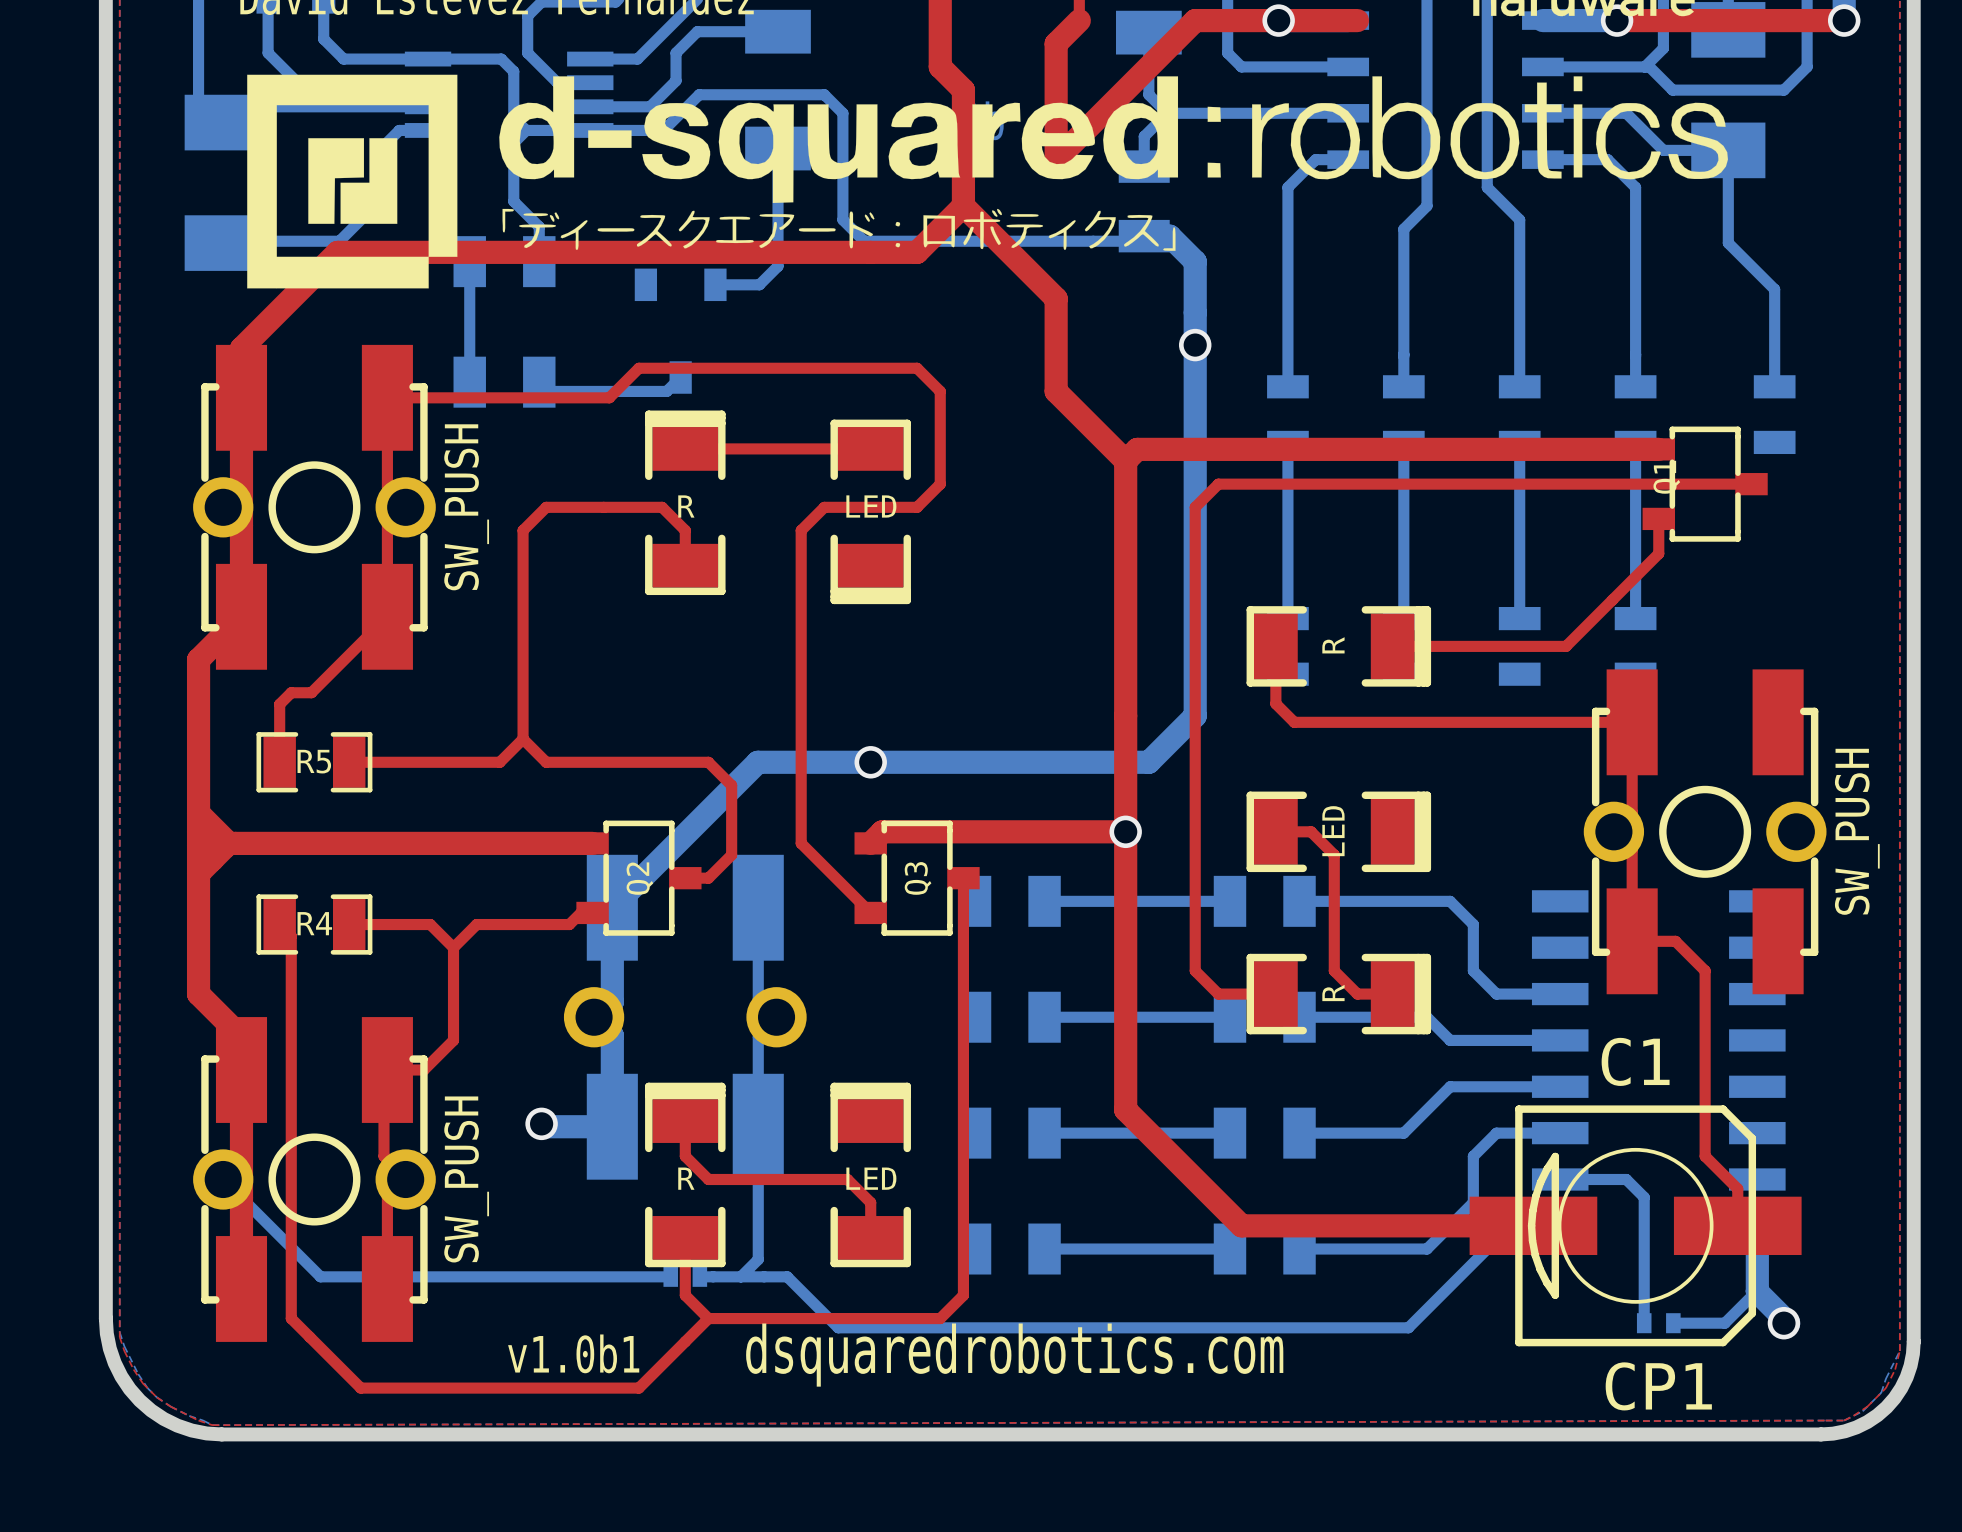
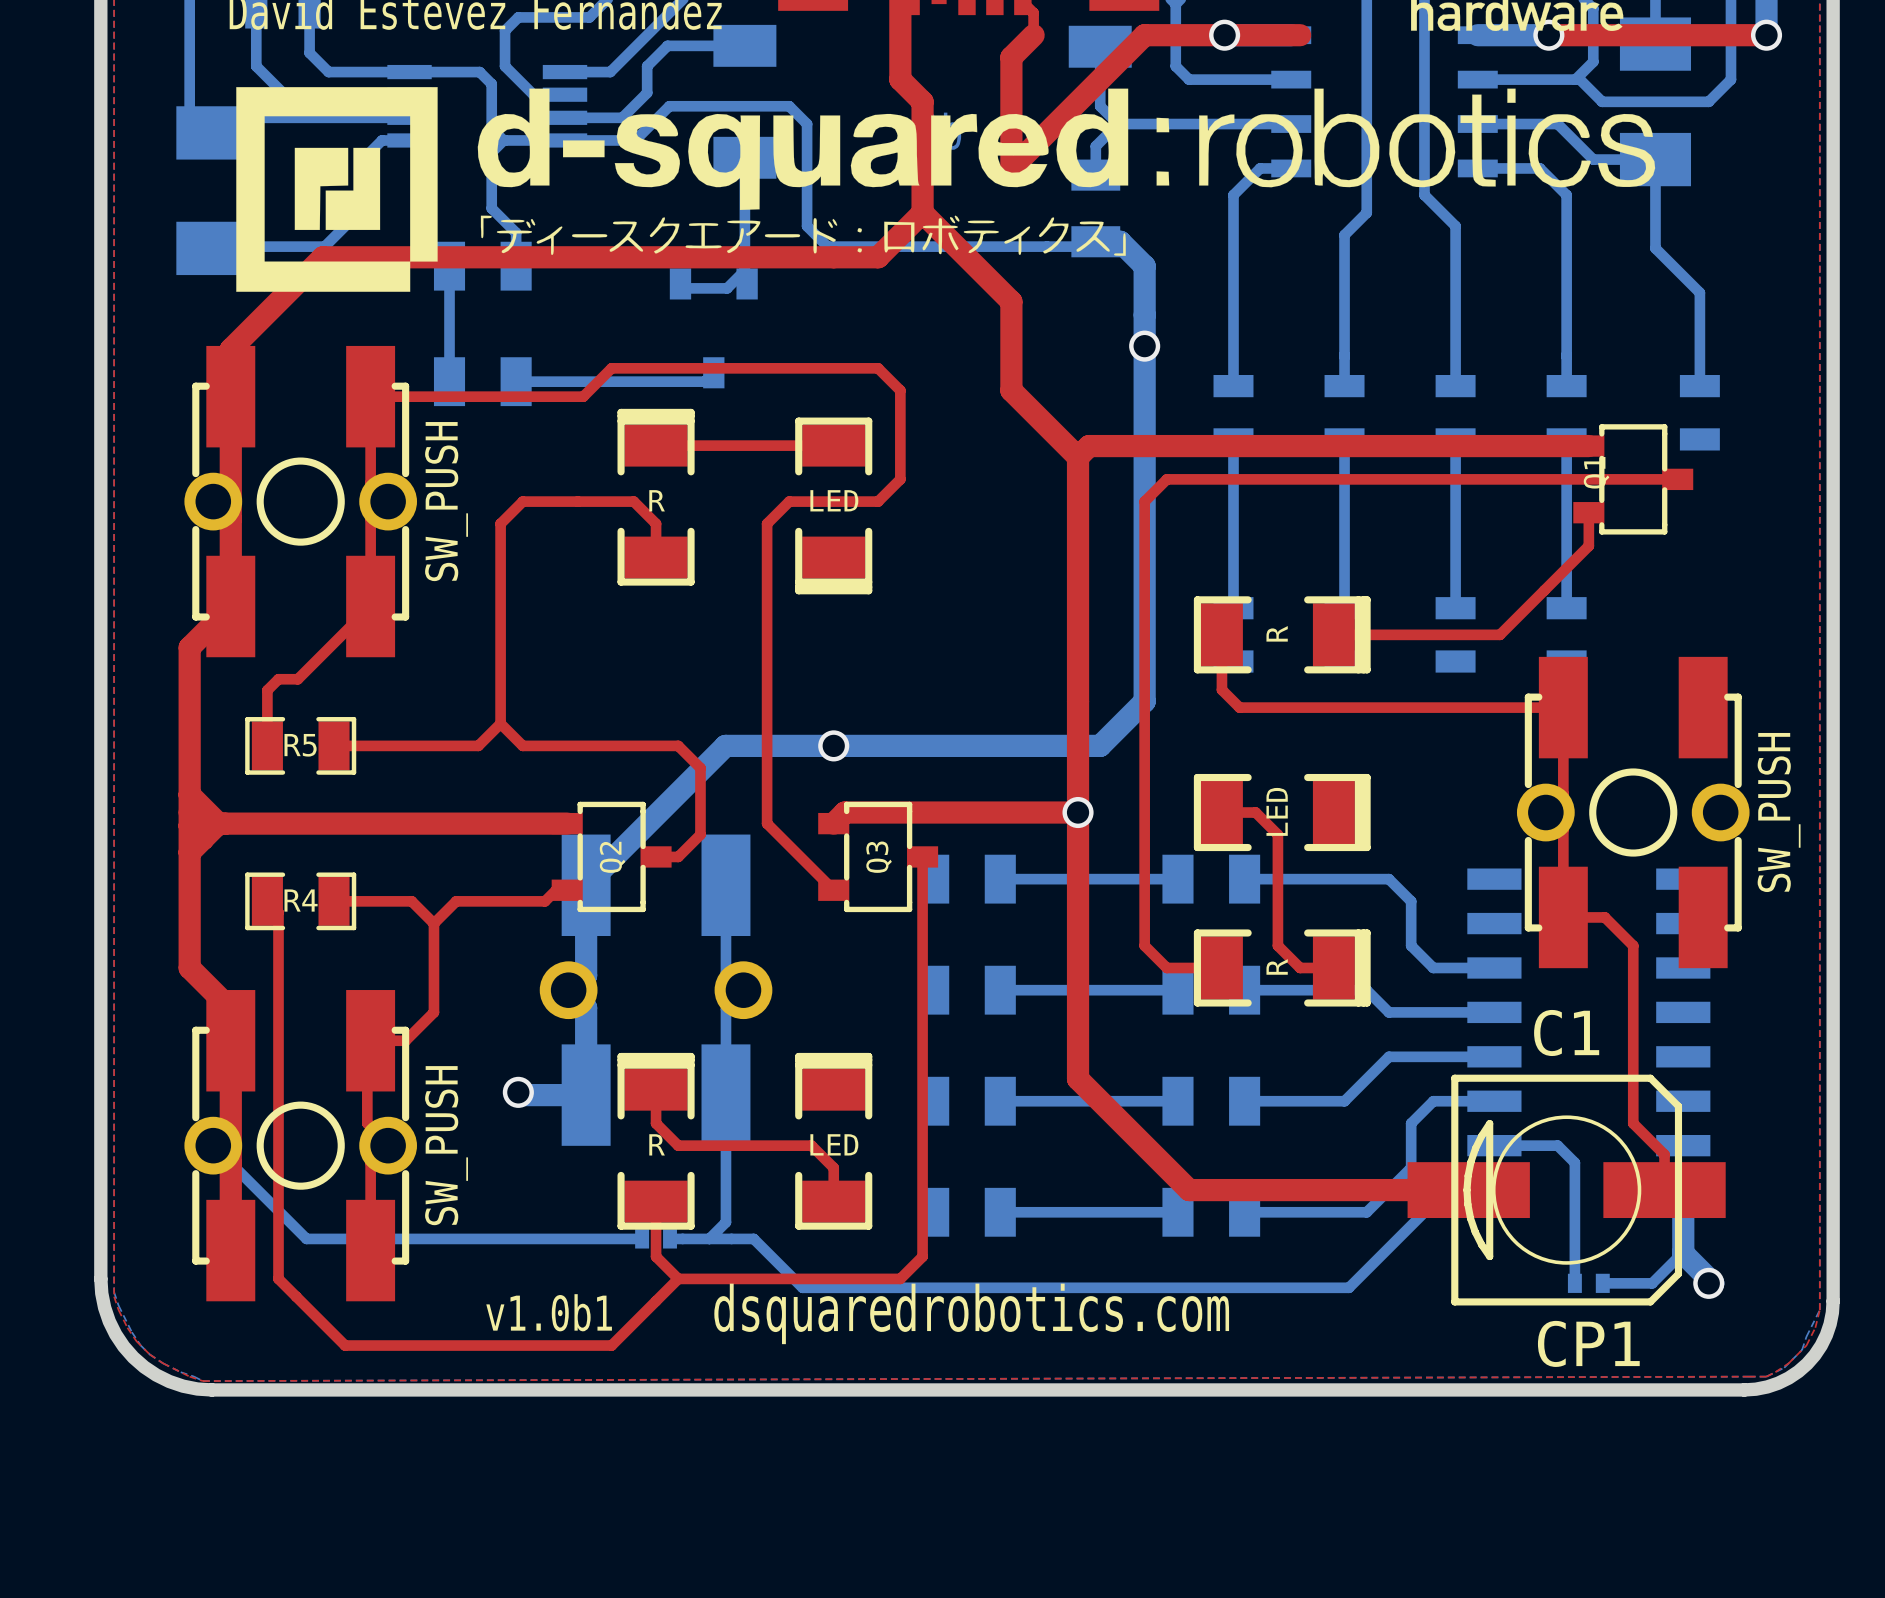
part position: (680, 331) -> (713, 328)
bottom track: (680, 377) (666, 391) (548, 391) (539, 382) -> (713, 372) (704, 381) (516, 381)

